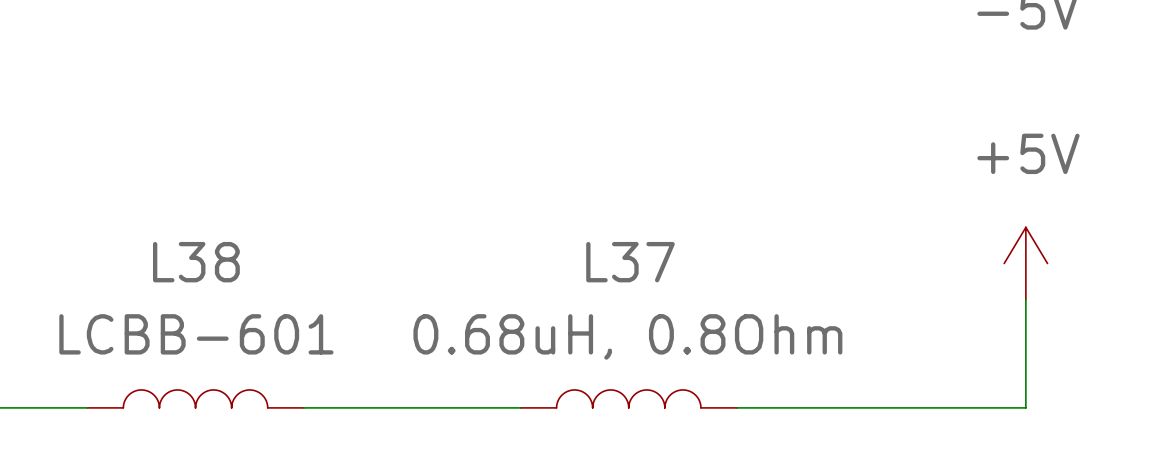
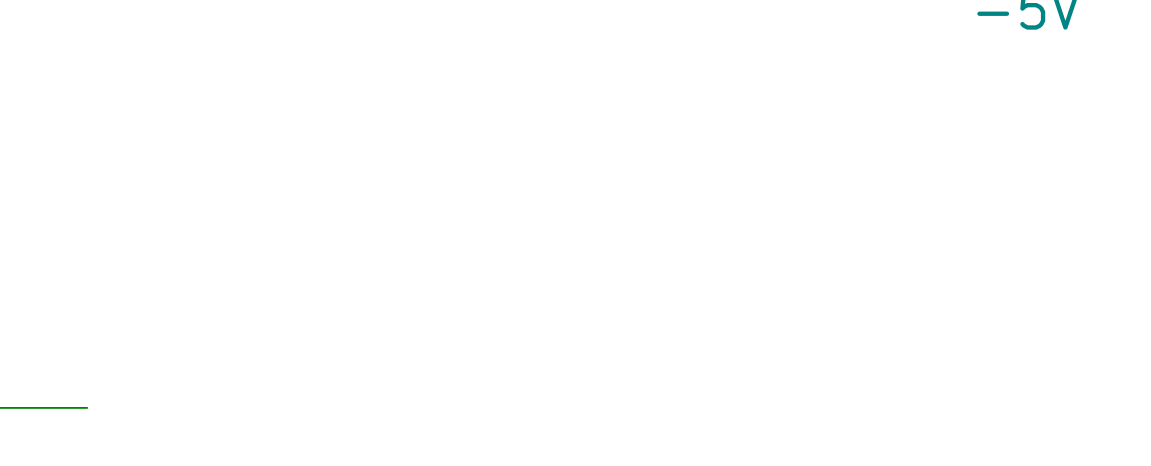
power symbol: +5V (1025, 263) -> none
wire: (1025, 299) (1025, 407) (737, 407) -> none
L38: LCBB-601 (195, 398) -> none
L37: 0.68uH, 0.8Ohm (628, 398) -> none
wire: (303, 407) (520, 407) -> none

